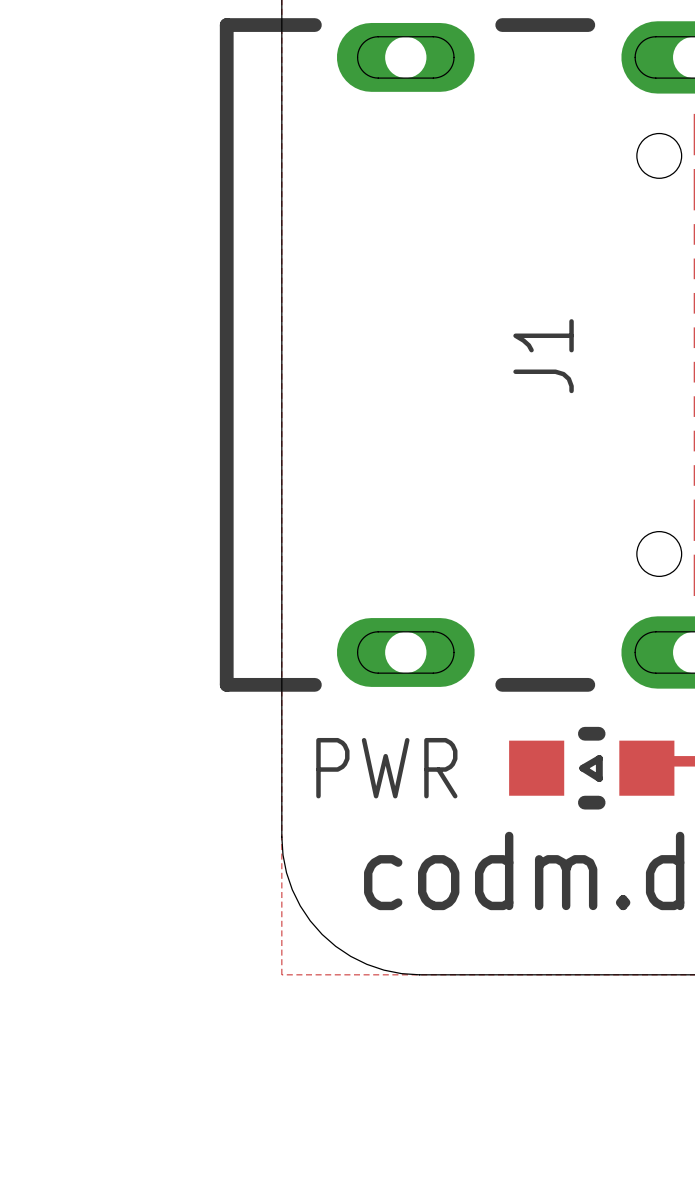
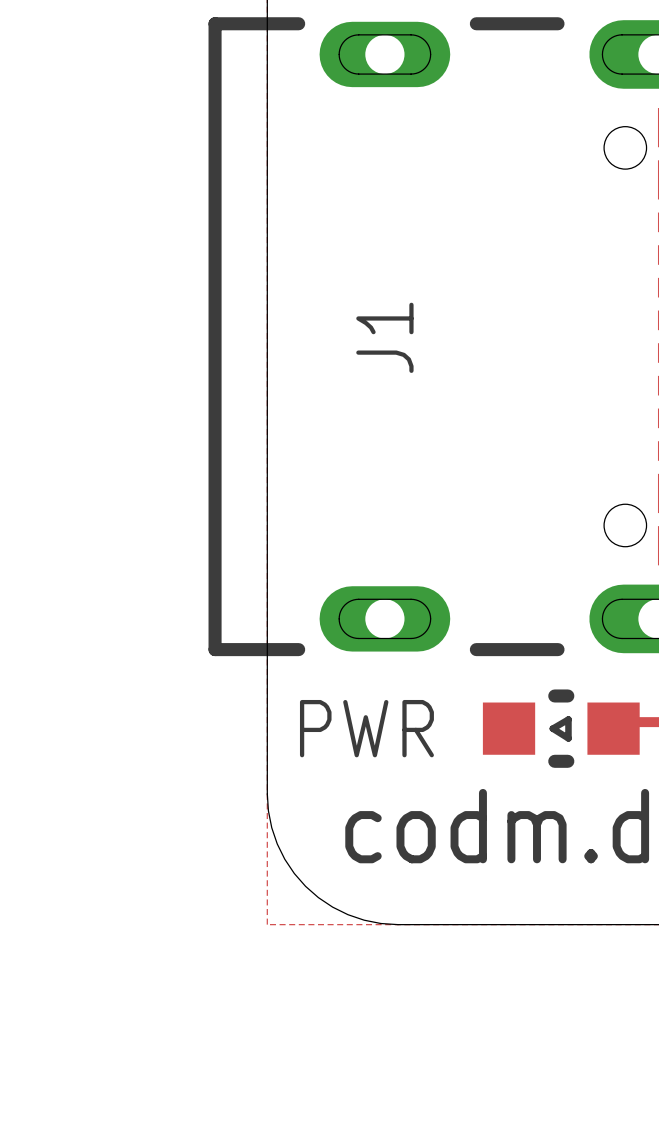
J1 name position: J1 (543, 356) -> J1 (384, 337)

